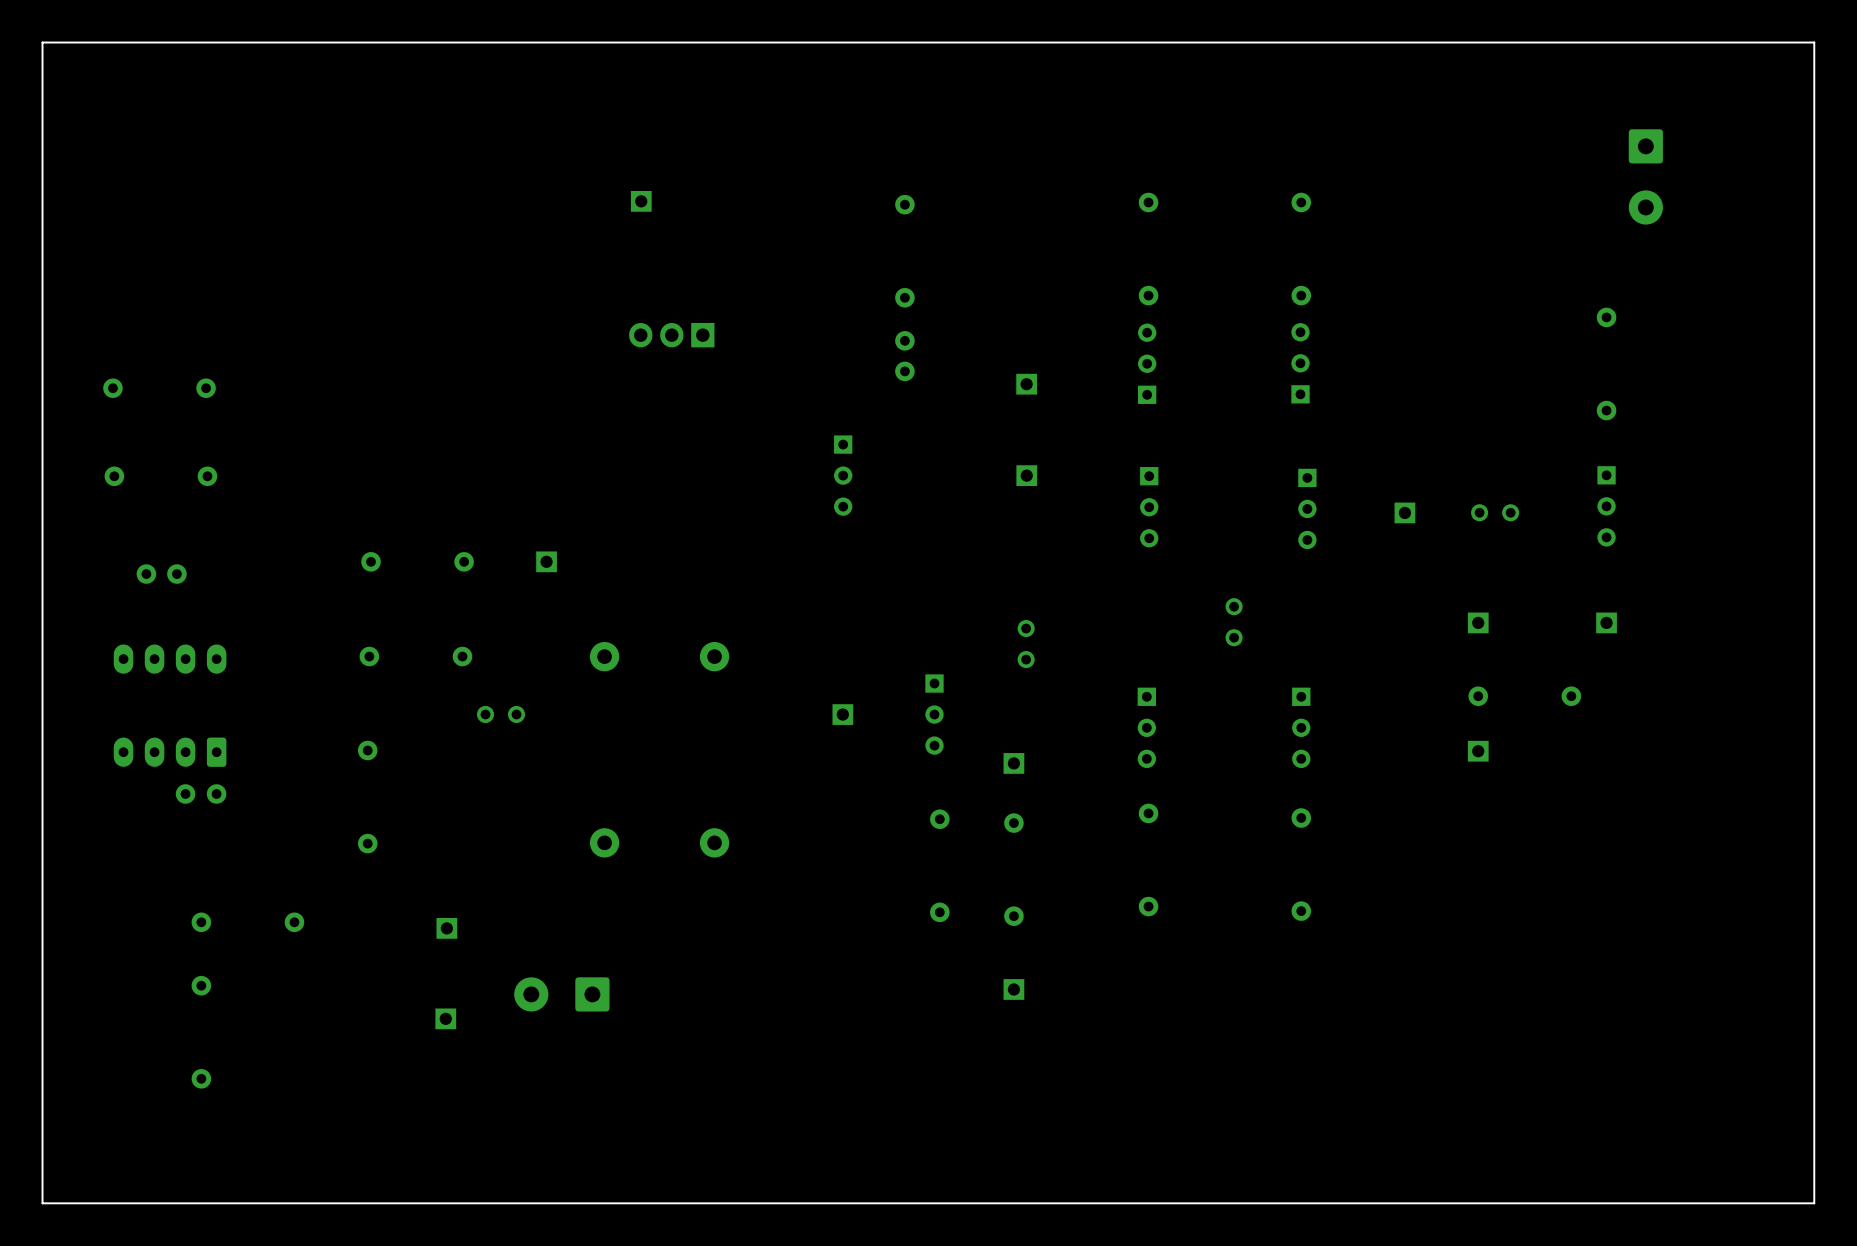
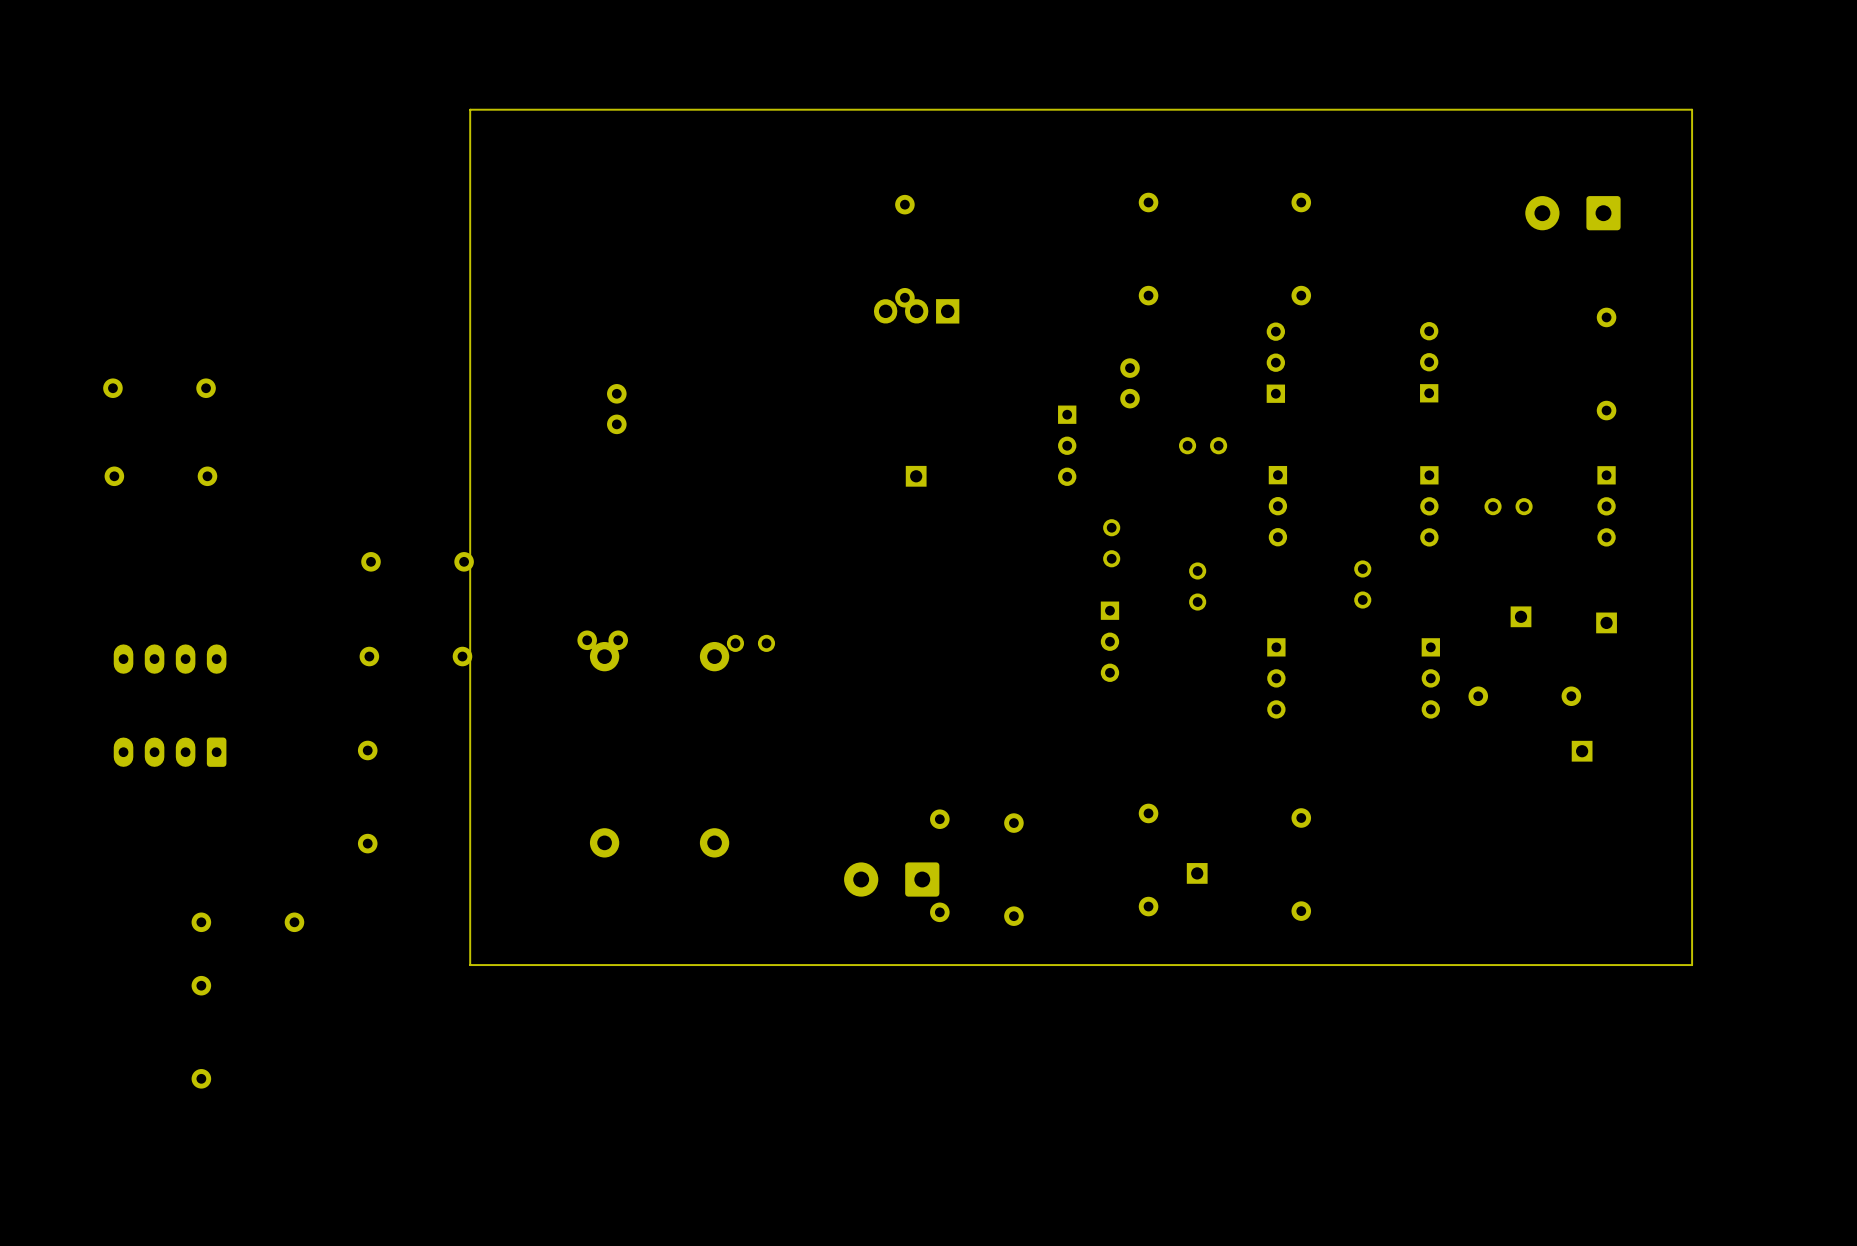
board edge: (1814, 42) (42, 42) (42, 1203) (1814, 1203) (1814, 42) -> (1692, 109) (1692, 965) (470, 965) (470, 109) (1692, 109)
part rotation: 0° (1645, 176) -> 90° clockwise (1572, 213)
part position: (1645, 176) -> (1572, 213)
part: (641, 201) -> none
part position: (671, 335) -> (916, 311)
part: (904, 356) -> none
part: none -> (1429, 362)
part: (1147, 363) -> none
part position: (1300, 363) -> (1275, 362)
part: none -> (1130, 383)
part: (1026, 384) -> none
part: none -> (616, 409)
part: none -> (1067, 445)
part: none -> (1203, 445)
part: (843, 475) -> none
part: (1026, 475) -> none
part: none -> (916, 476)
part: none -> (1429, 506)
part: (1149, 507) -> none
part position: (1307, 508) -> (1277, 506)
part: (1404, 512) -> none
part position: (1495, 512) -> (1508, 506)
part: none -> (1111, 543)
part: (546, 561) -> none
part: (161, 574) -> none
part: none -> (1362, 584)
part position: (1234, 622) -> (1197, 586)
part position: (1478, 622) -> (1521, 616)
part: none -> (602, 640)
part: none -> (1109, 641)
part: none -> (750, 643)
part: (1026, 644) -> none
part: none -> (1430, 678)
part: (501, 714) -> none
part: (842, 714) -> none
part: (934, 714) -> none
part: (1146, 727) -> none
part position: (1301, 727) -> (1276, 678)
part: (1478, 751) -> none
part: none -> (1582, 751)
part: (1013, 763) -> none
part: (201, 793) -> none
part: none -> (1197, 873)
part: none -> (891, 879)
part: (446, 928) -> none
part: (1013, 989) -> none
part: (561, 994) -> none
part: (445, 1018) -> none

